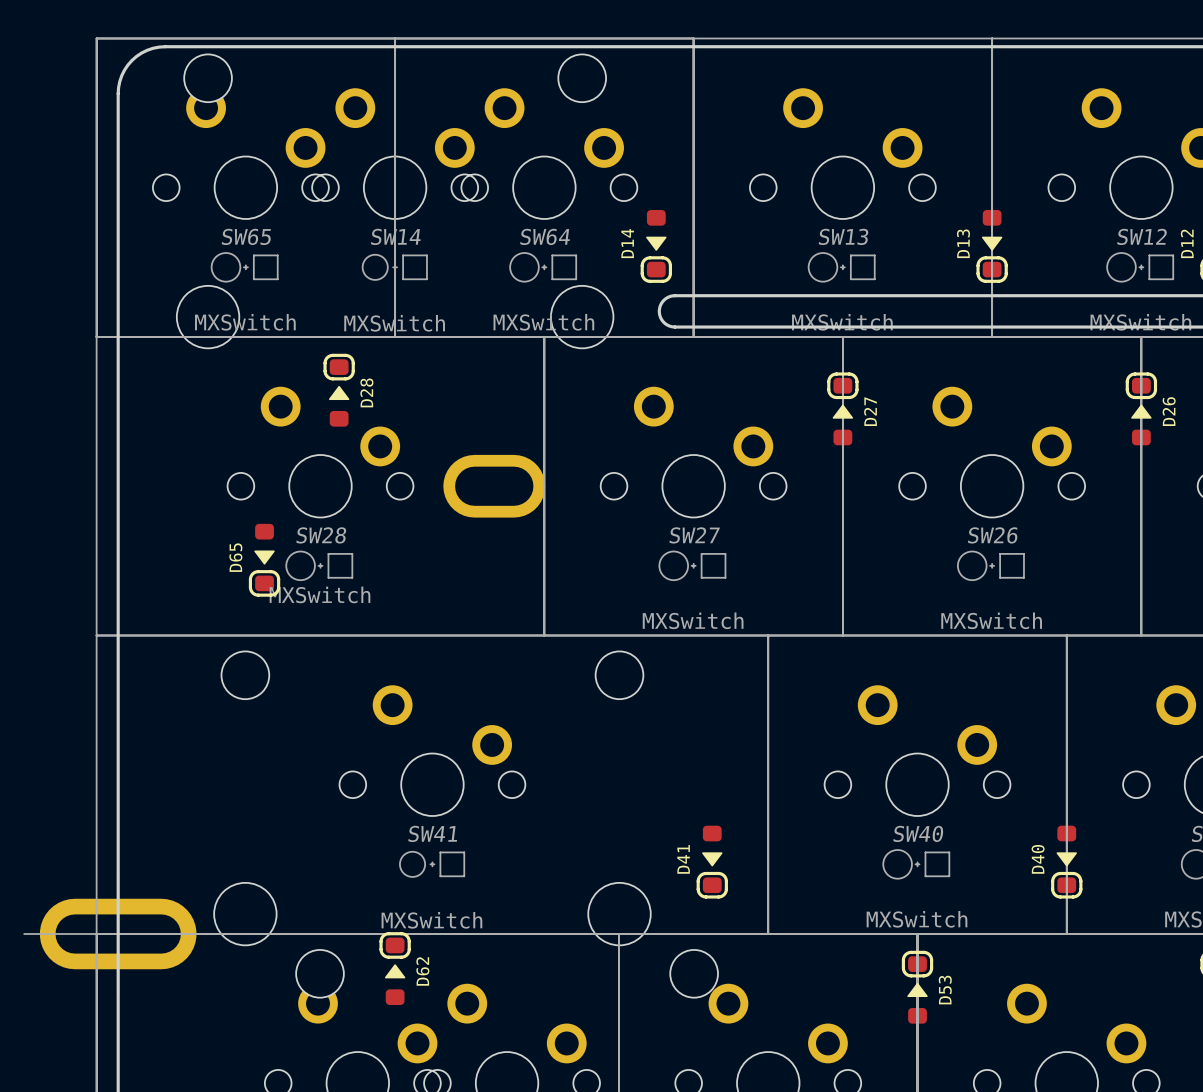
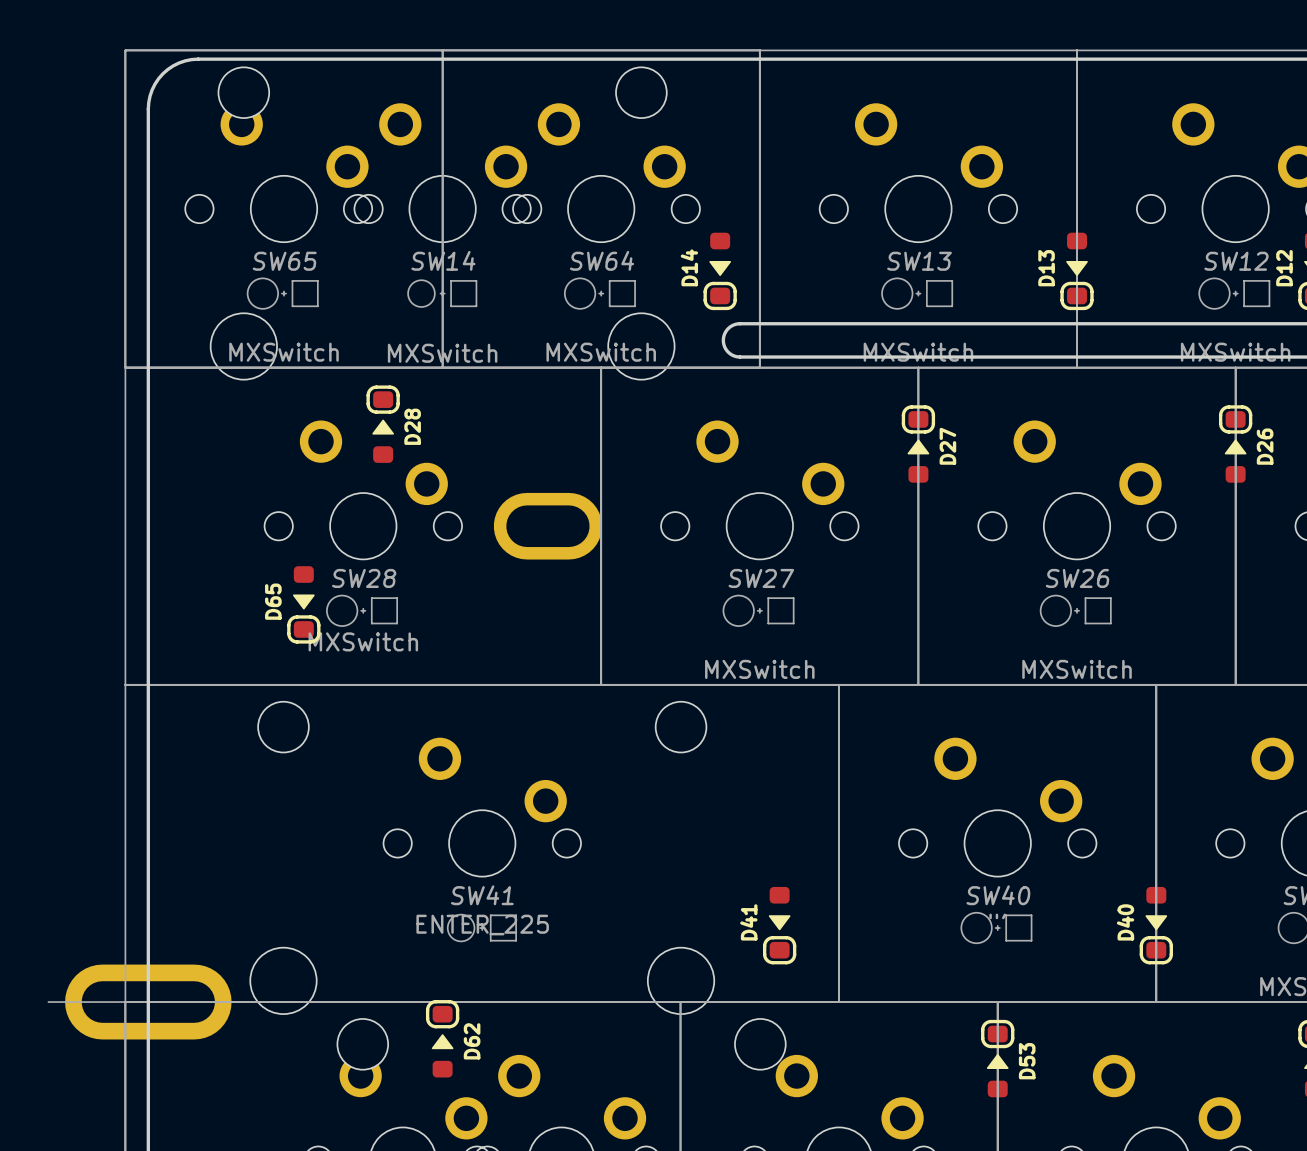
SW40 value: MXSwitch (917, 919) -> "' (997, 916)
SW41 value: MXSwitch (431, 920) -> ENTER_225 (482, 925)

